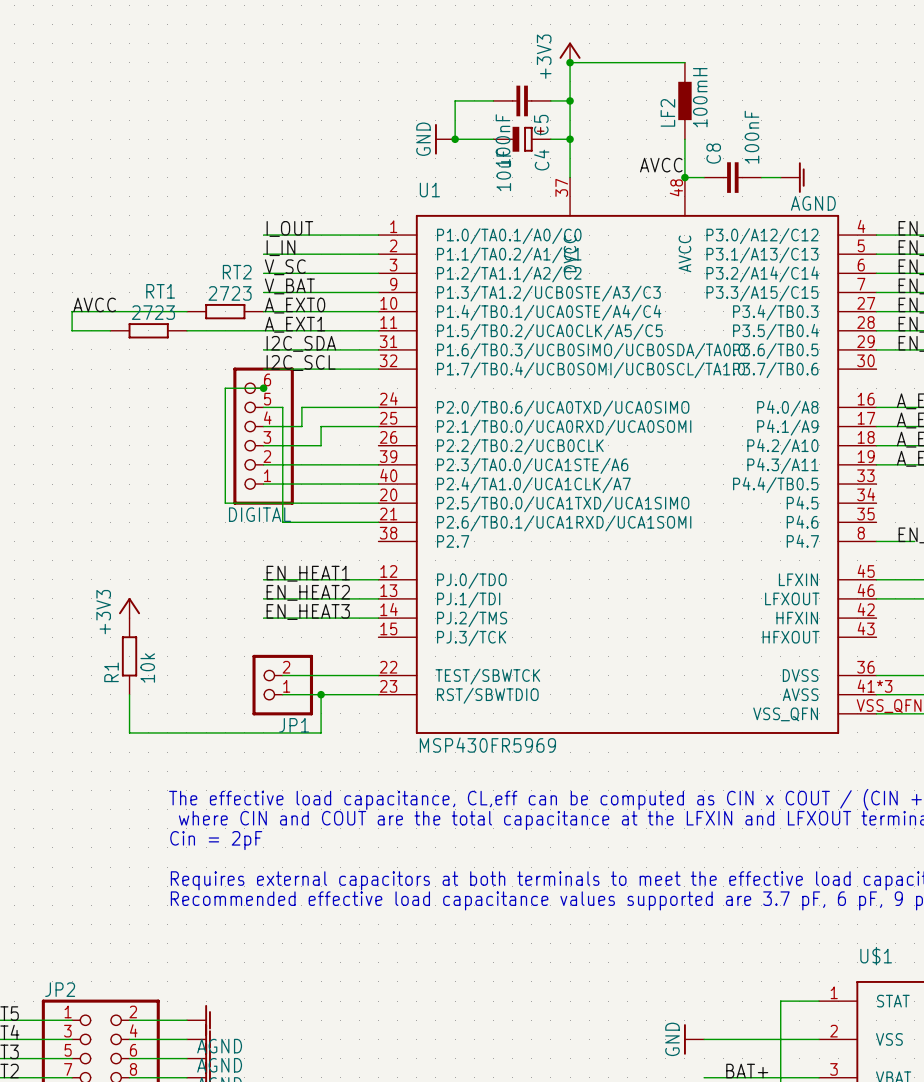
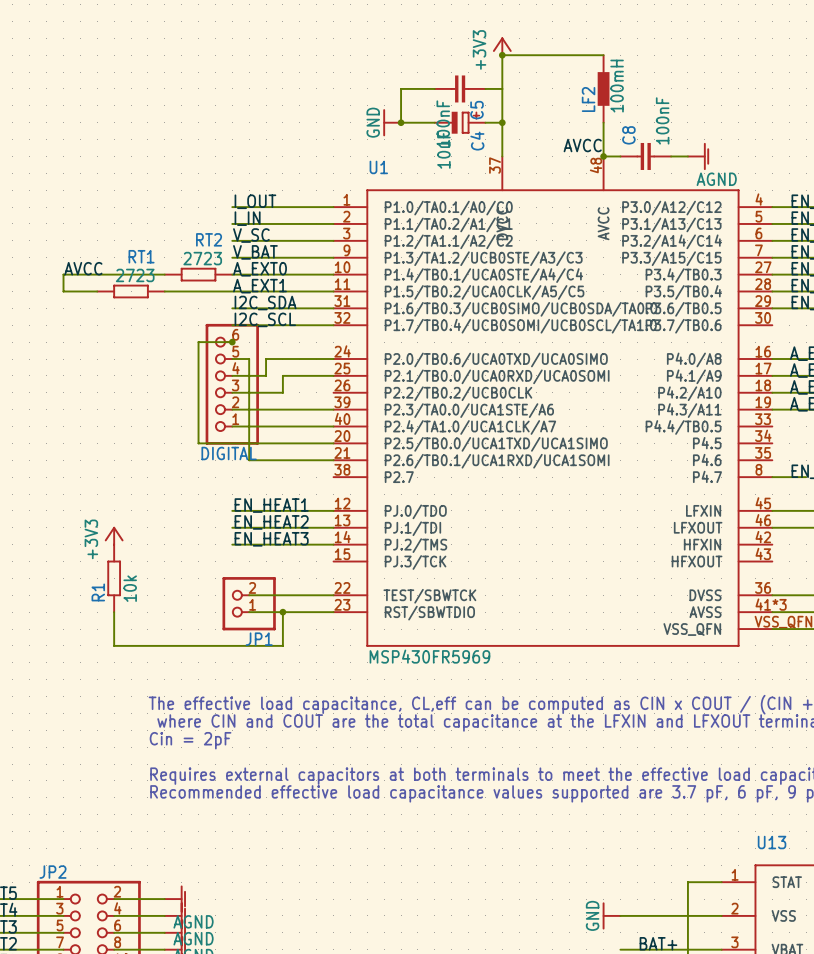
junction: (570, 100) -> none
U$1 name: U$1 (876, 956) -> U13 (772, 842)

